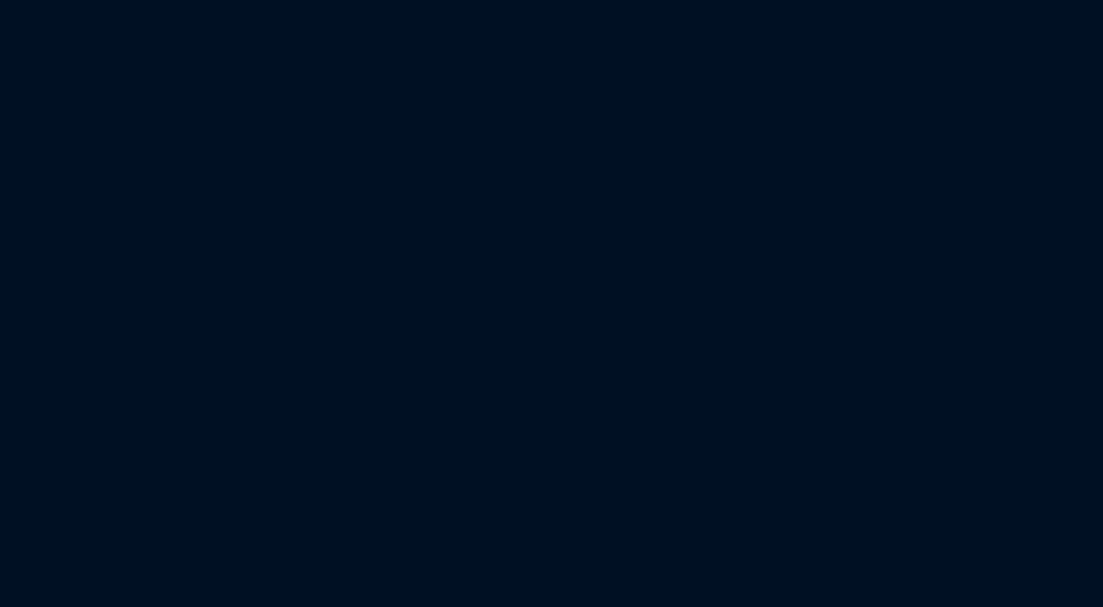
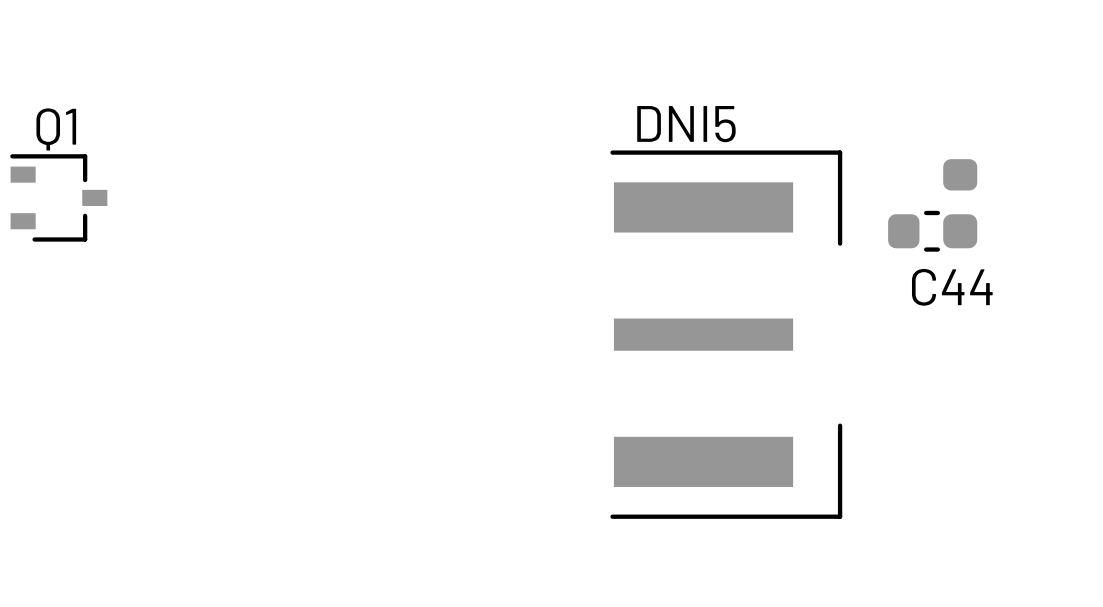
Q1: none -> (58, 197)
C44: none -> (932, 205)
DNI5: none -> (726, 334)

